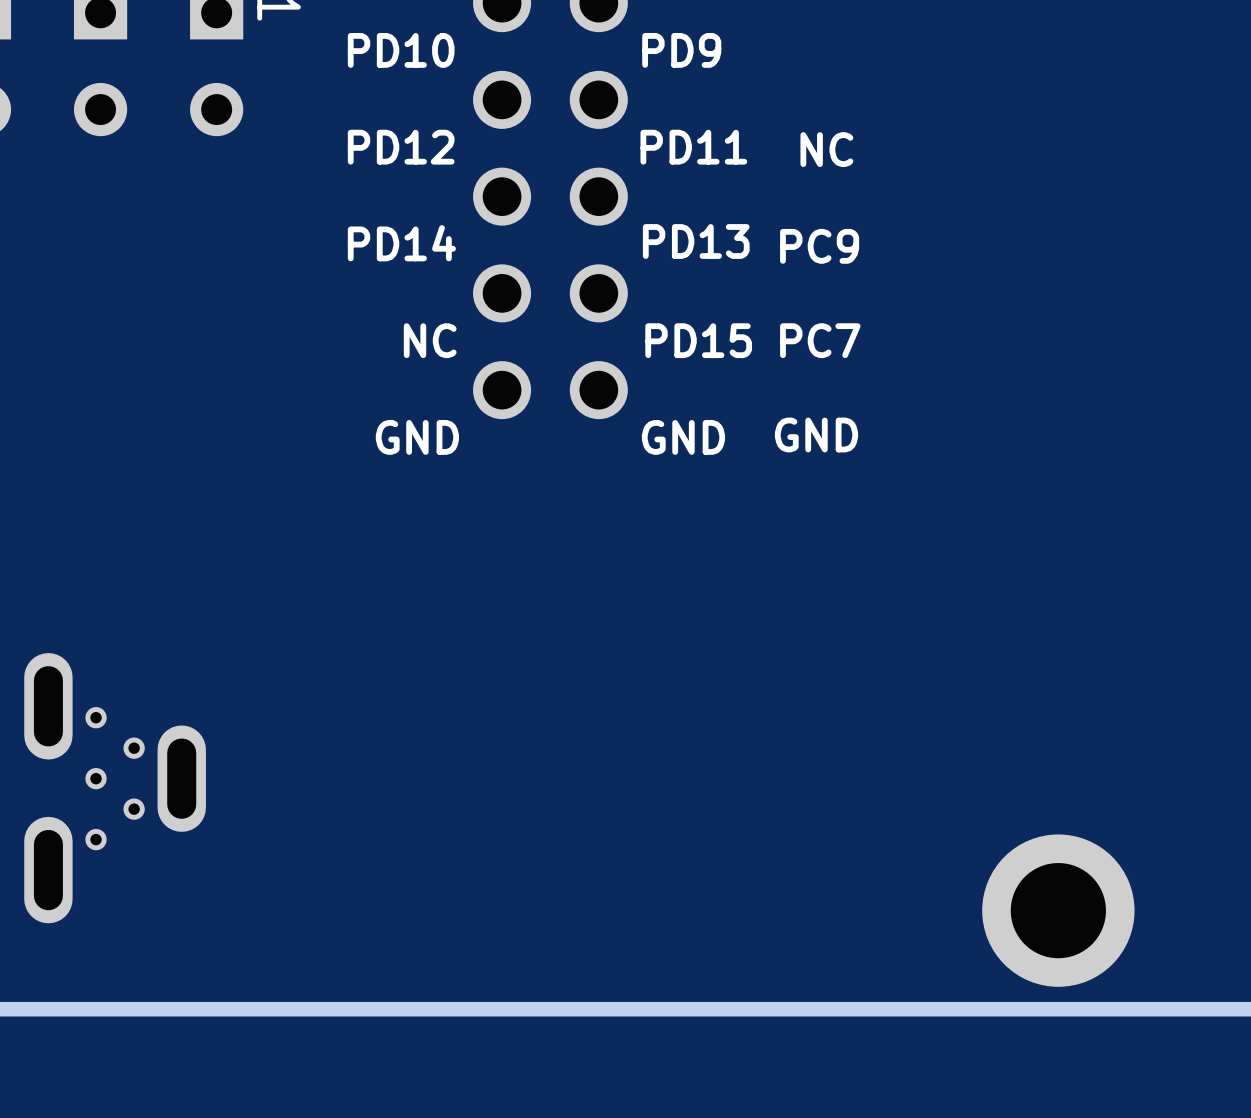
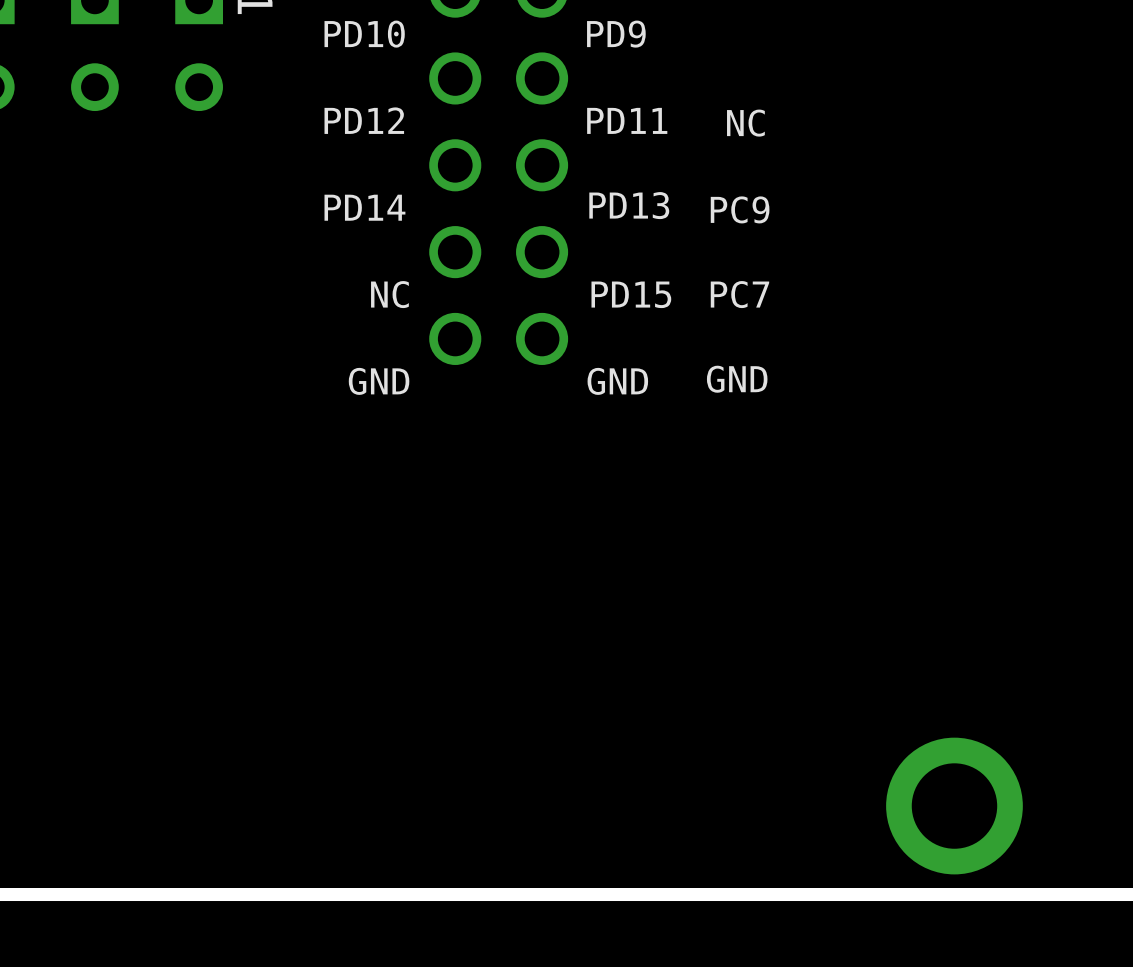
part: (115, 788) -> none

